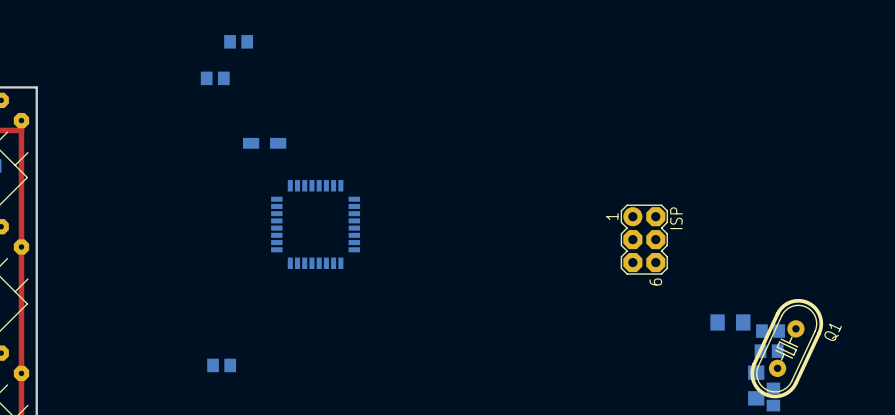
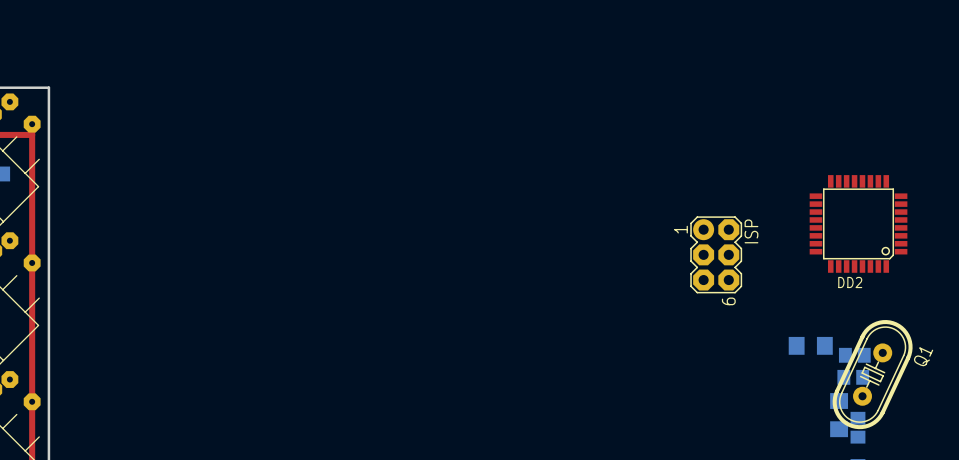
part: (238, 41) -> none
part: (215, 78) -> none
part: (264, 143) -> none
DD2: none -> (858, 223)
part: (315, 224) -> none
part: (221, 365) -> none

